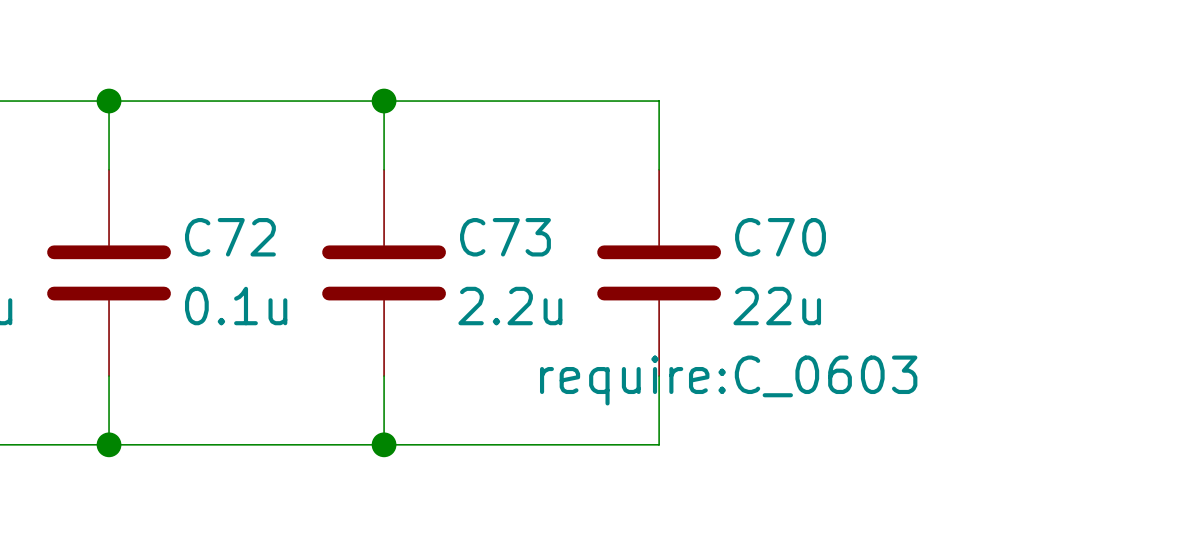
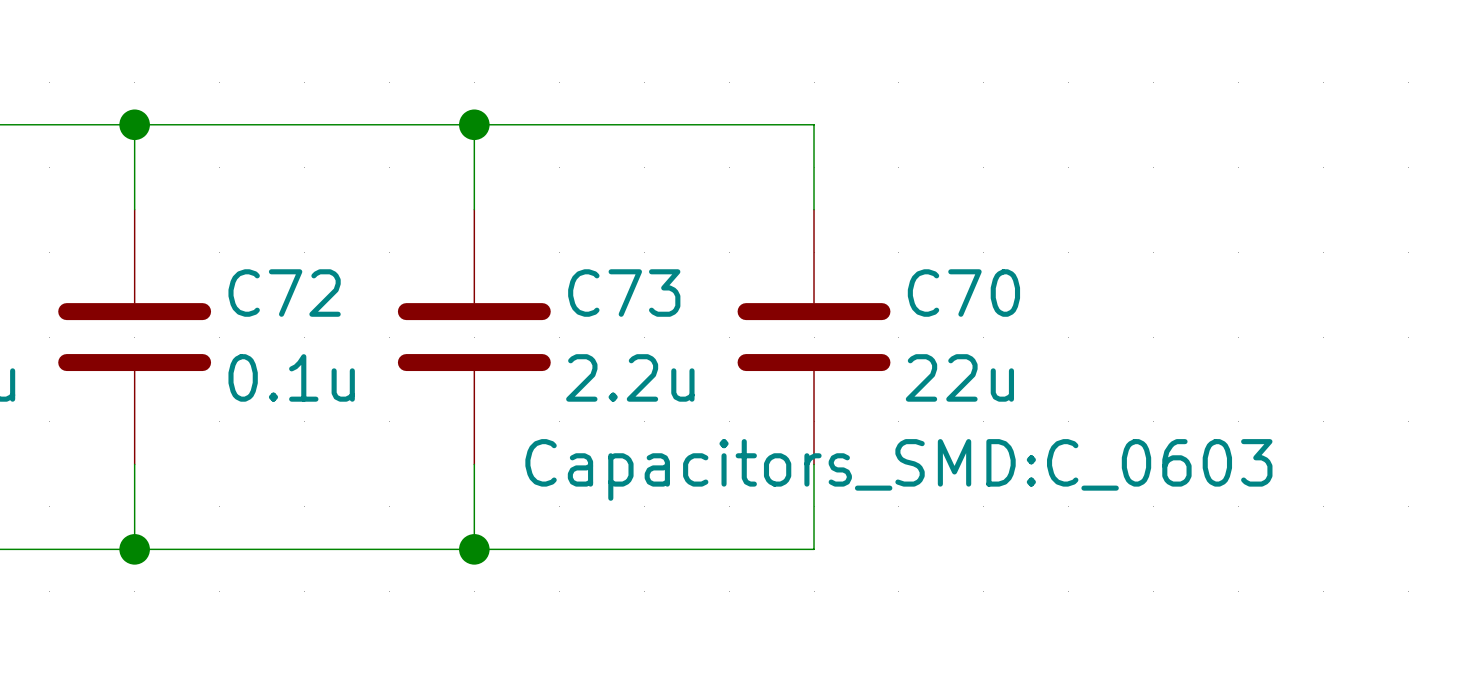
C70 text: require:C_0603 (728, 380) -> Capacitors_SMD:C_0603 (898, 469)

